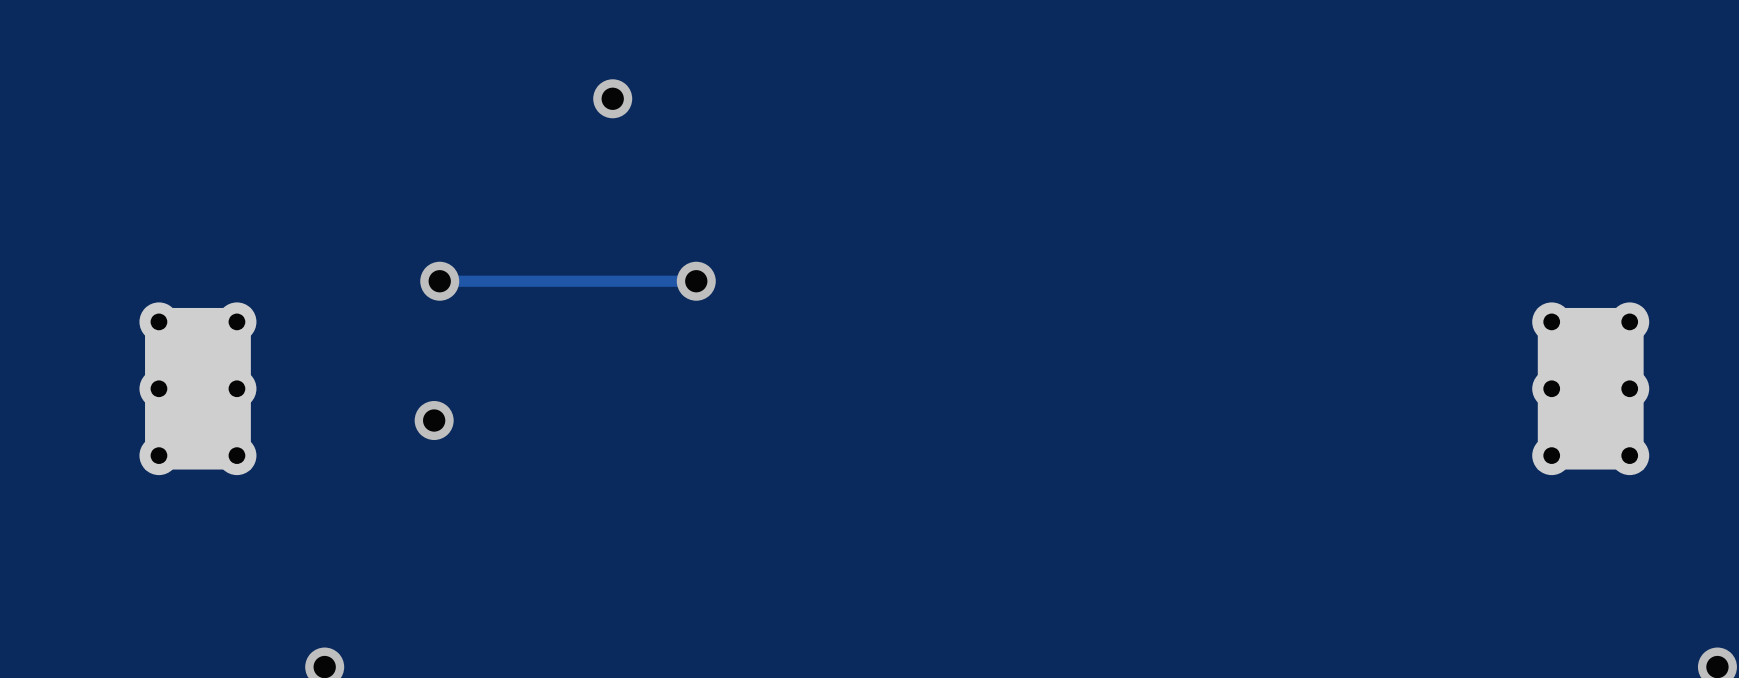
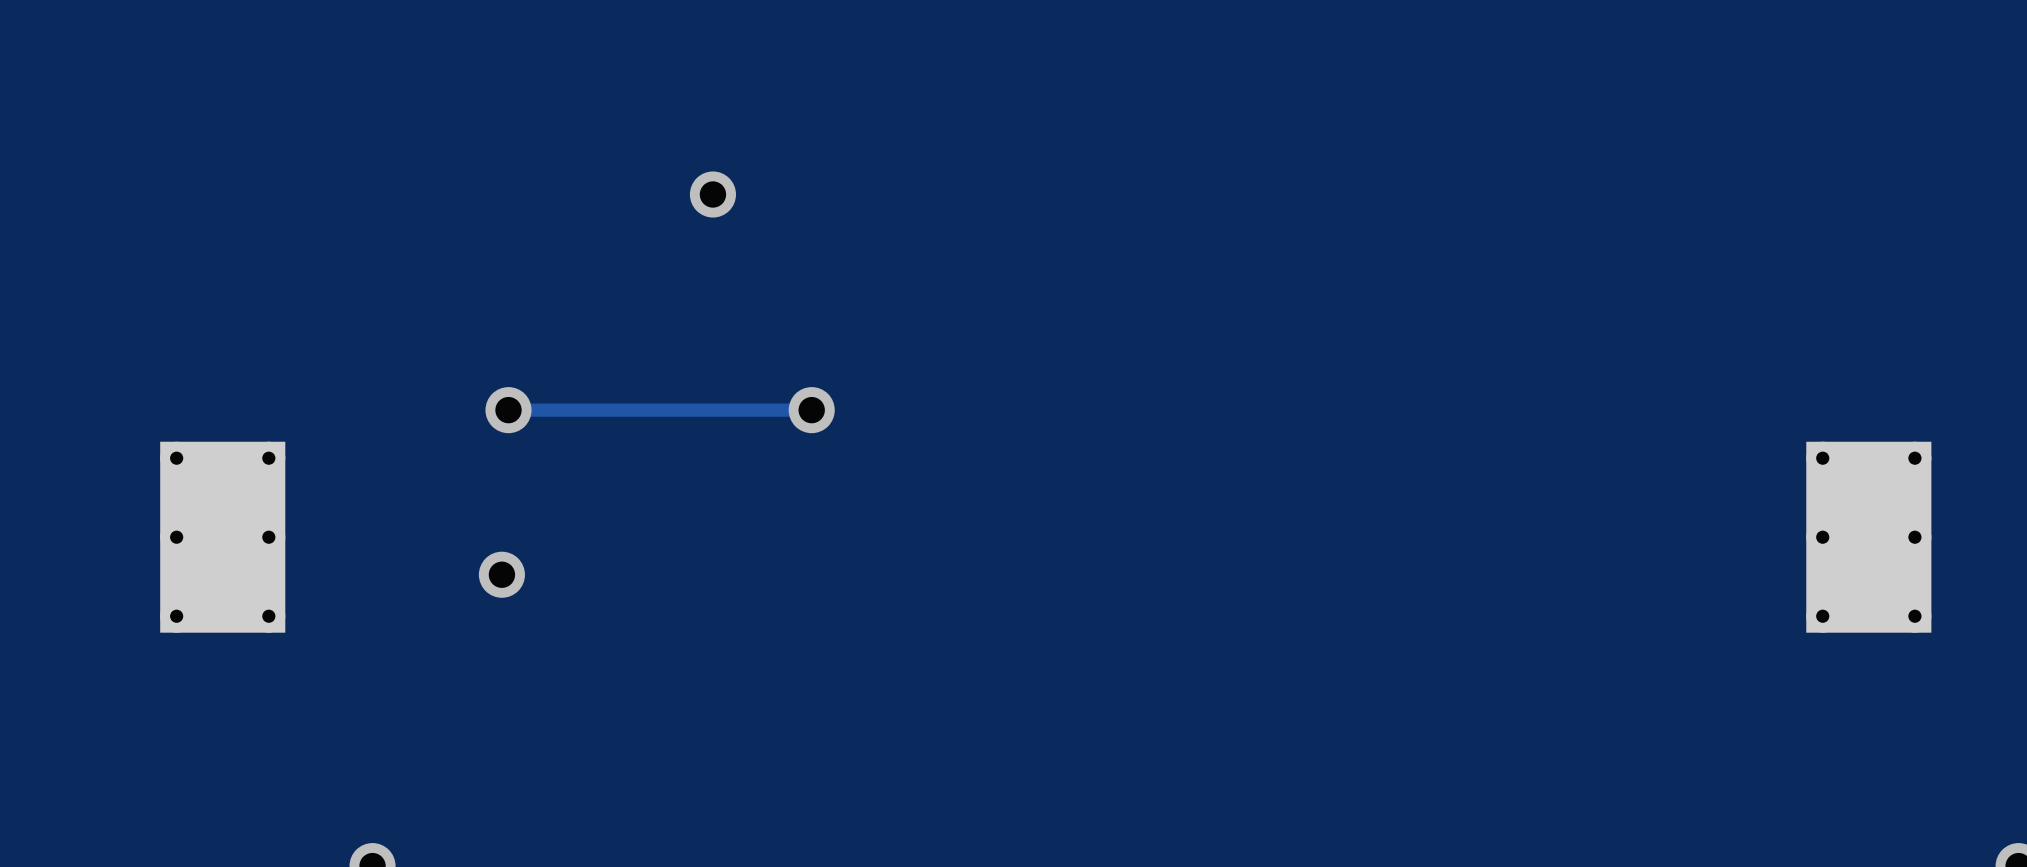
part footprint: [139, 302, 257, 476] -> [160, 441, 286, 633]
part footprint: [1532, 302, 1650, 476] -> [1806, 441, 1932, 633]

